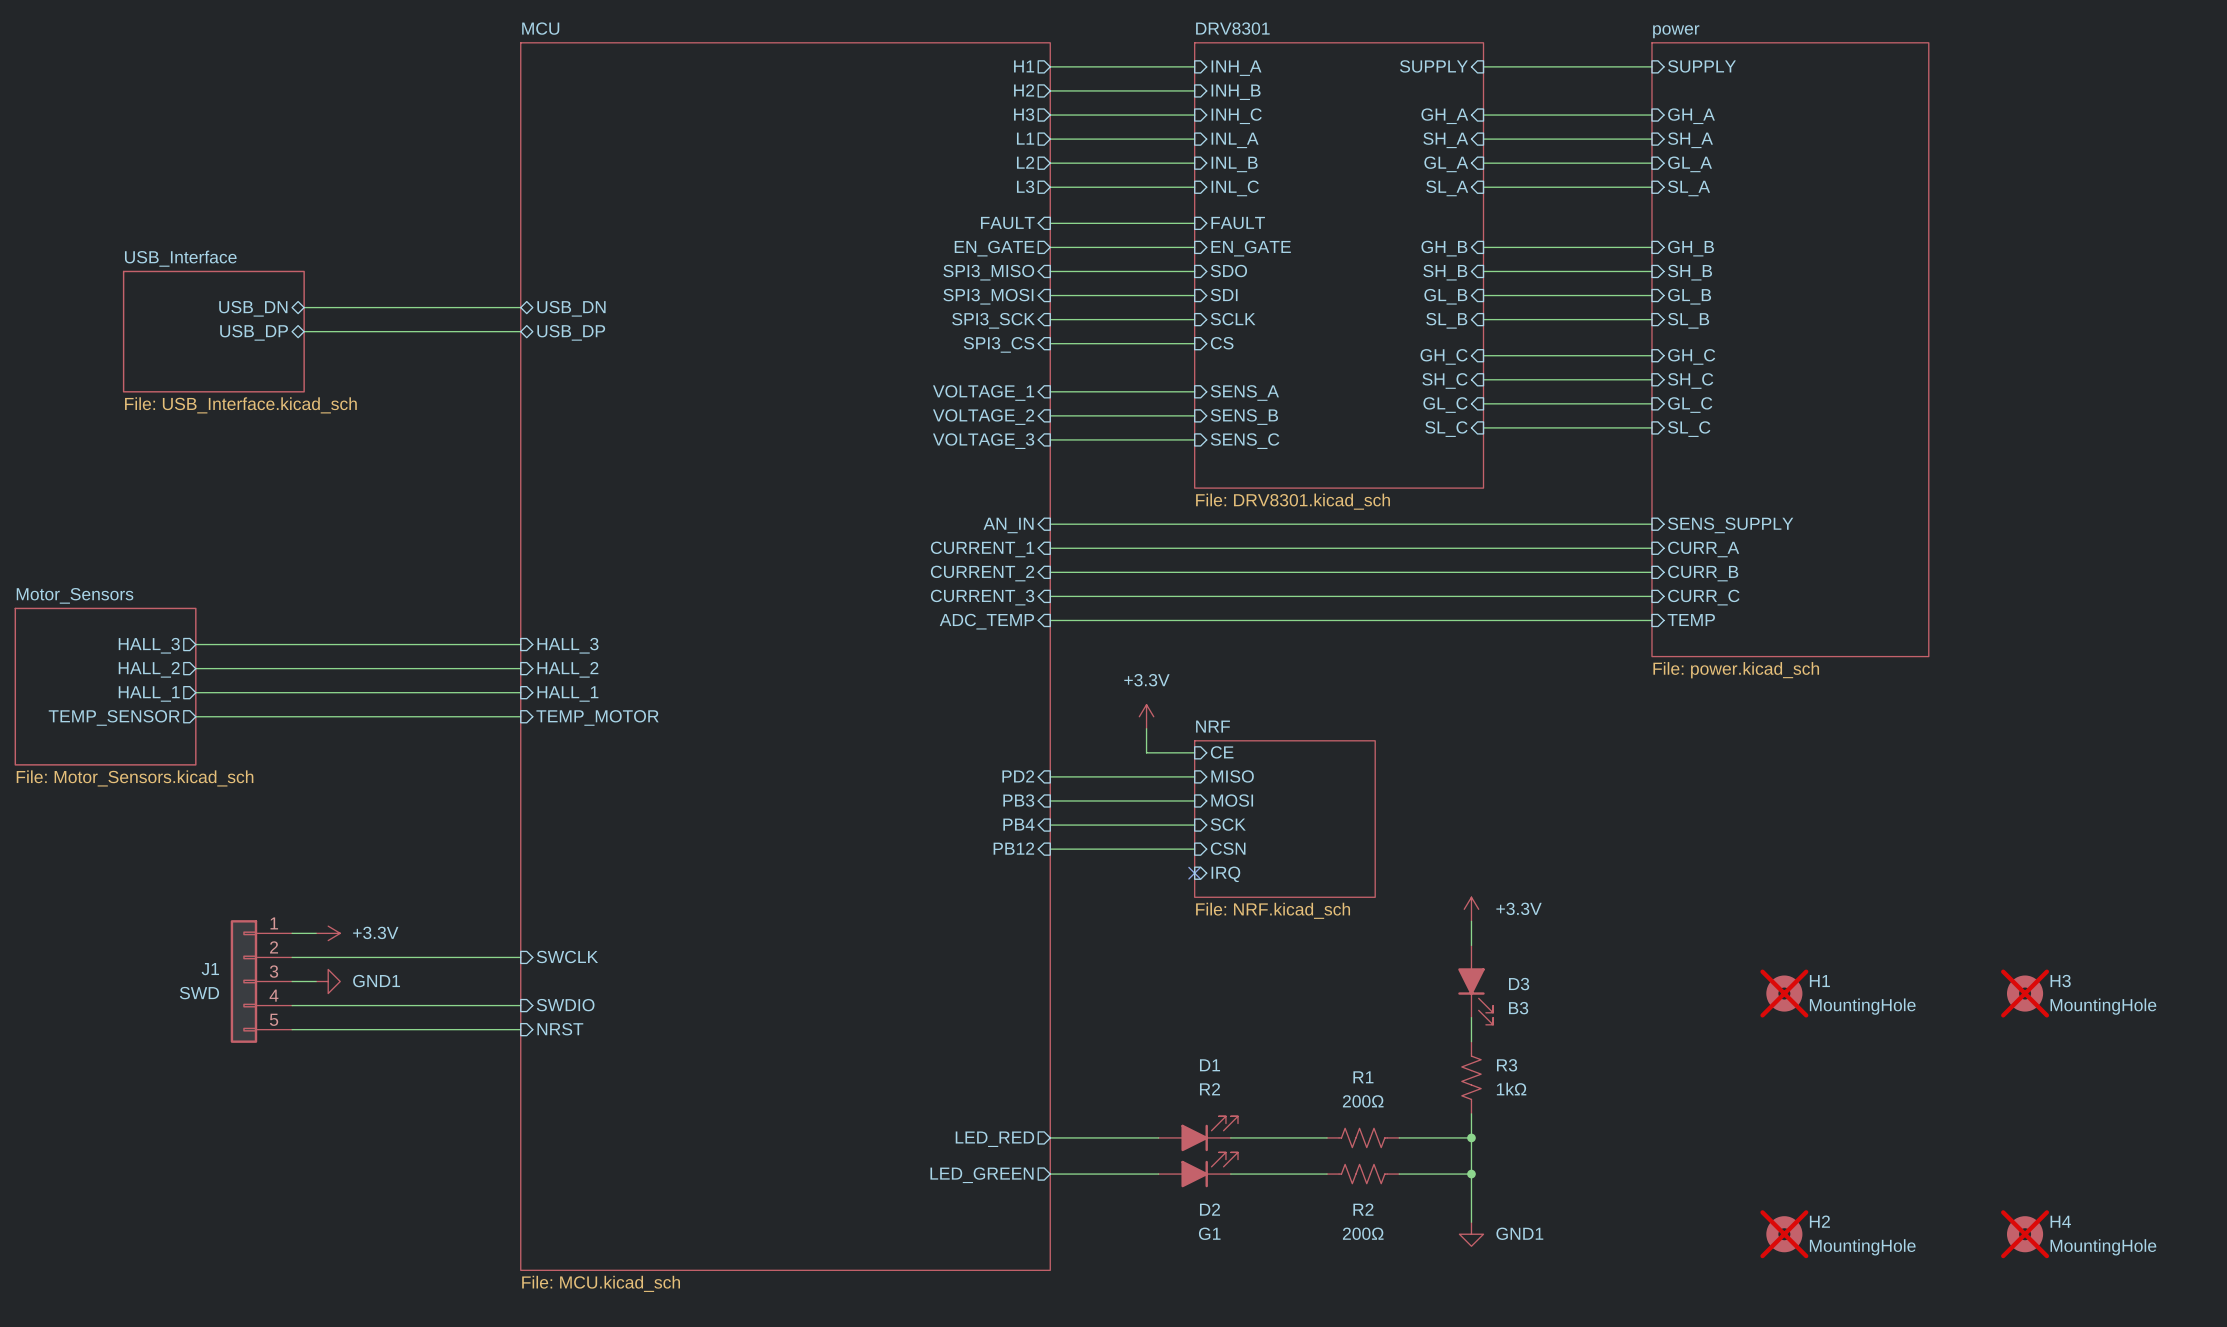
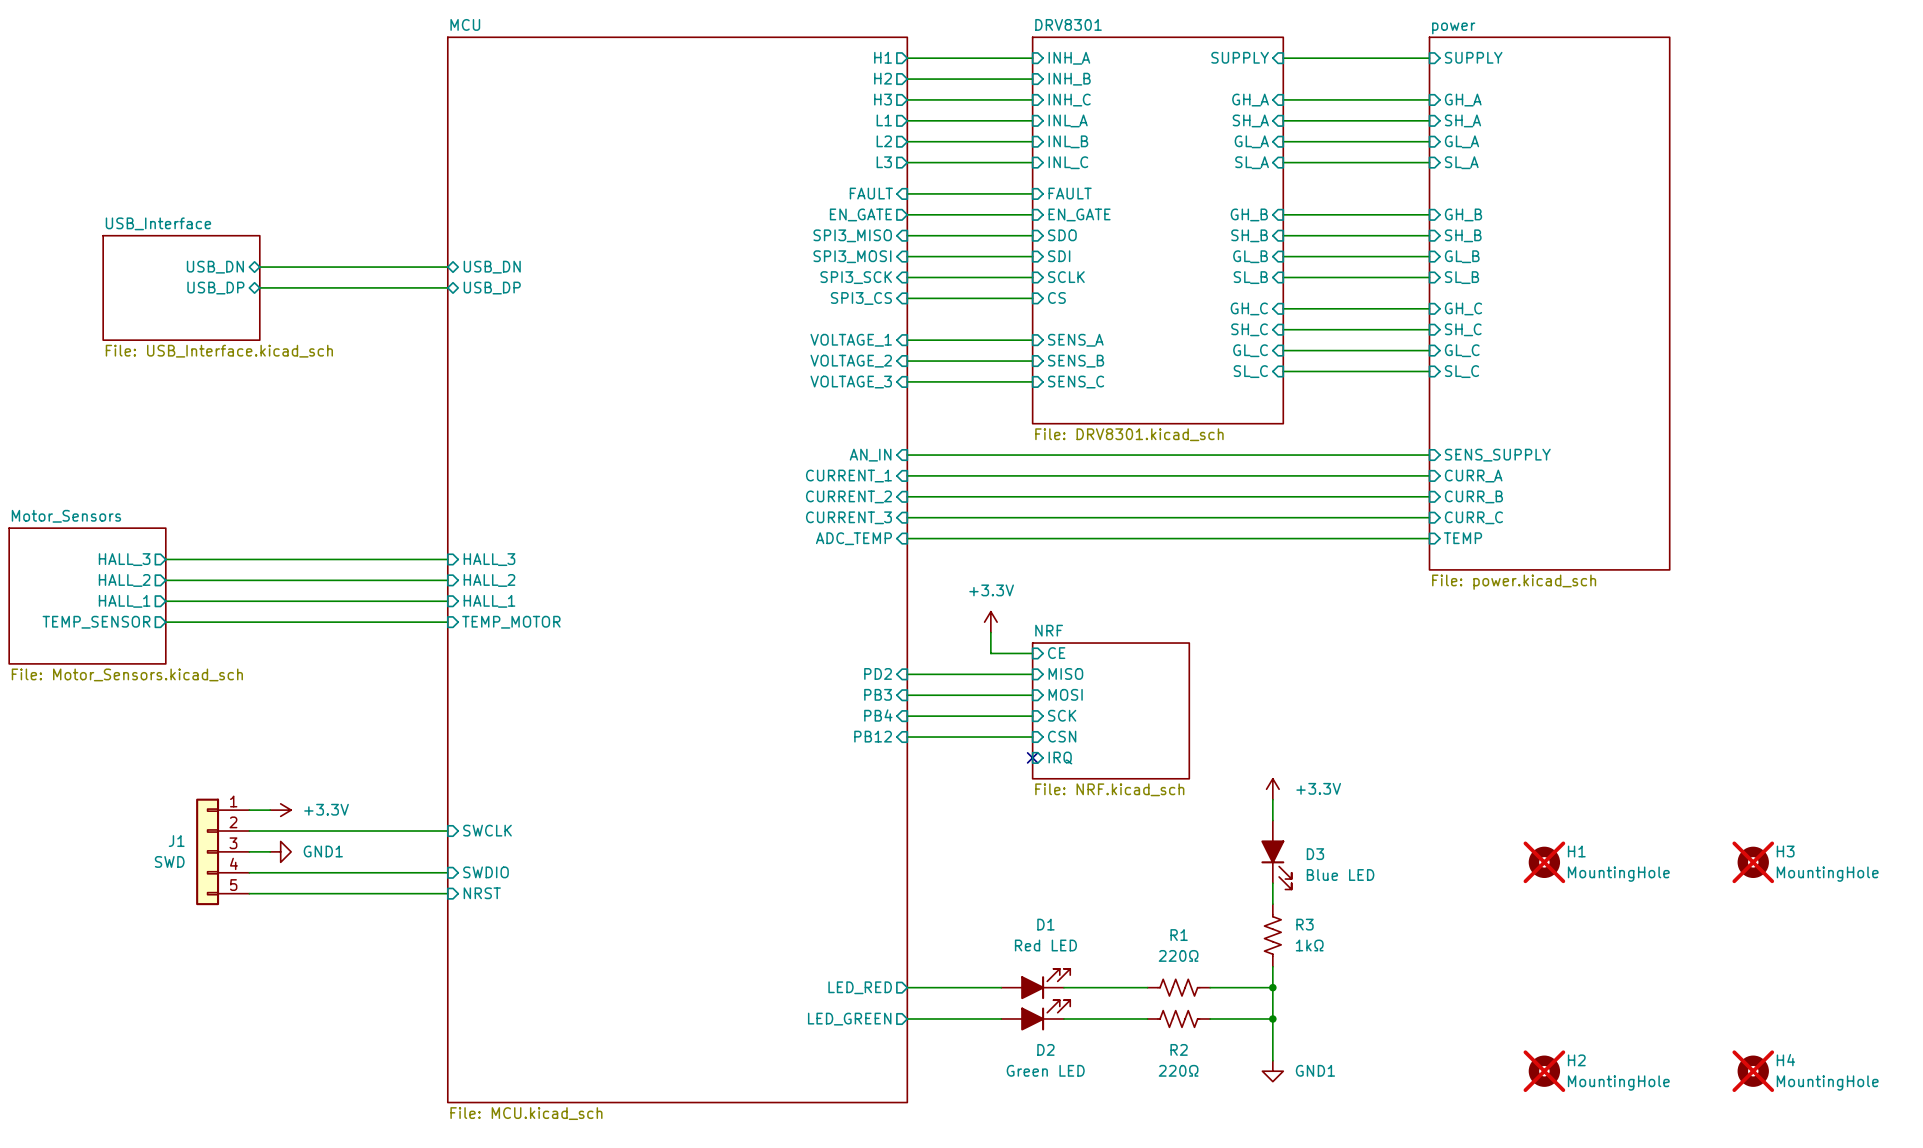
D3 value: B3 (1518, 1008) -> Blue LED (1340, 875)
D1 value: R2 (1210, 1089) -> Red LED (1045, 945)
R1 value: 200Ω (1363, 1101) -> 220Ω (1178, 955)
D2 value: G1 (1209, 1233) -> Green LED (1045, 1070)
R2 value: 200Ω (1363, 1233) -> 220Ω (1178, 1070)

